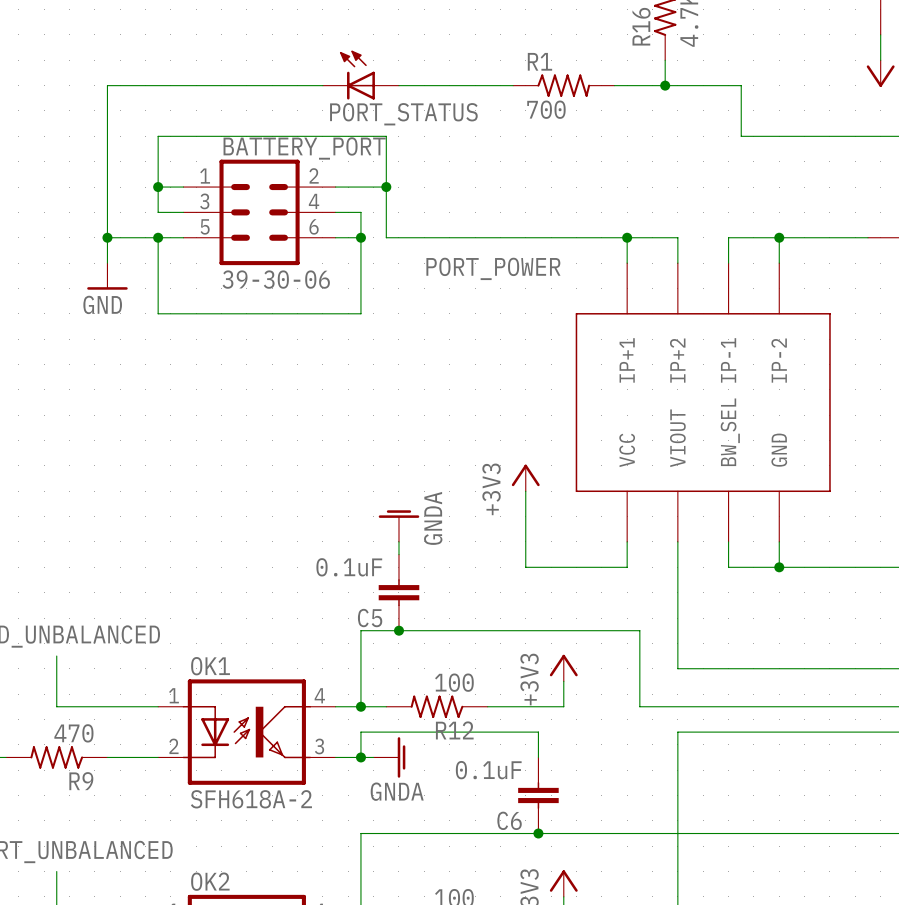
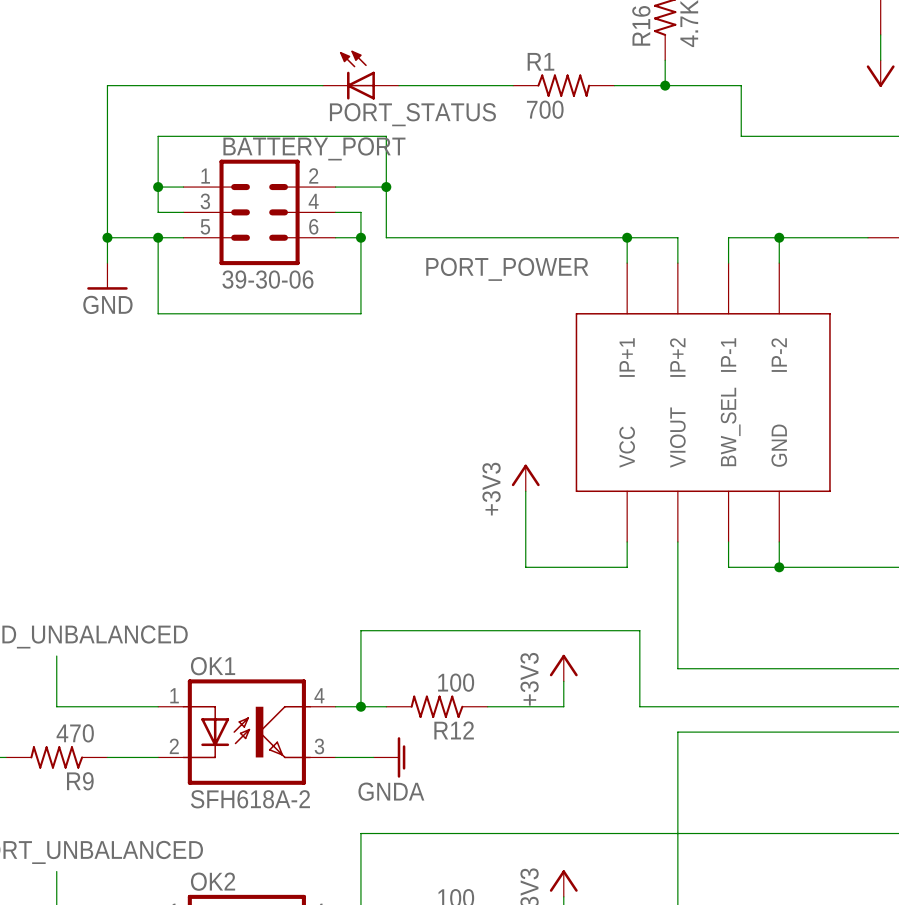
power symbol: GNDA (398, 526) -> none
wire: (398, 541) (398, 554) -> none
C5: 0.1uF (398, 592) -> none
junction: (398, 630) -> none
wire: (360, 757) (360, 732) (538, 732) (538, 757) -> none
junction: (360, 757) -> none
C6: 0.1uF (538, 795) -> none
junction: (538, 833) -> none

